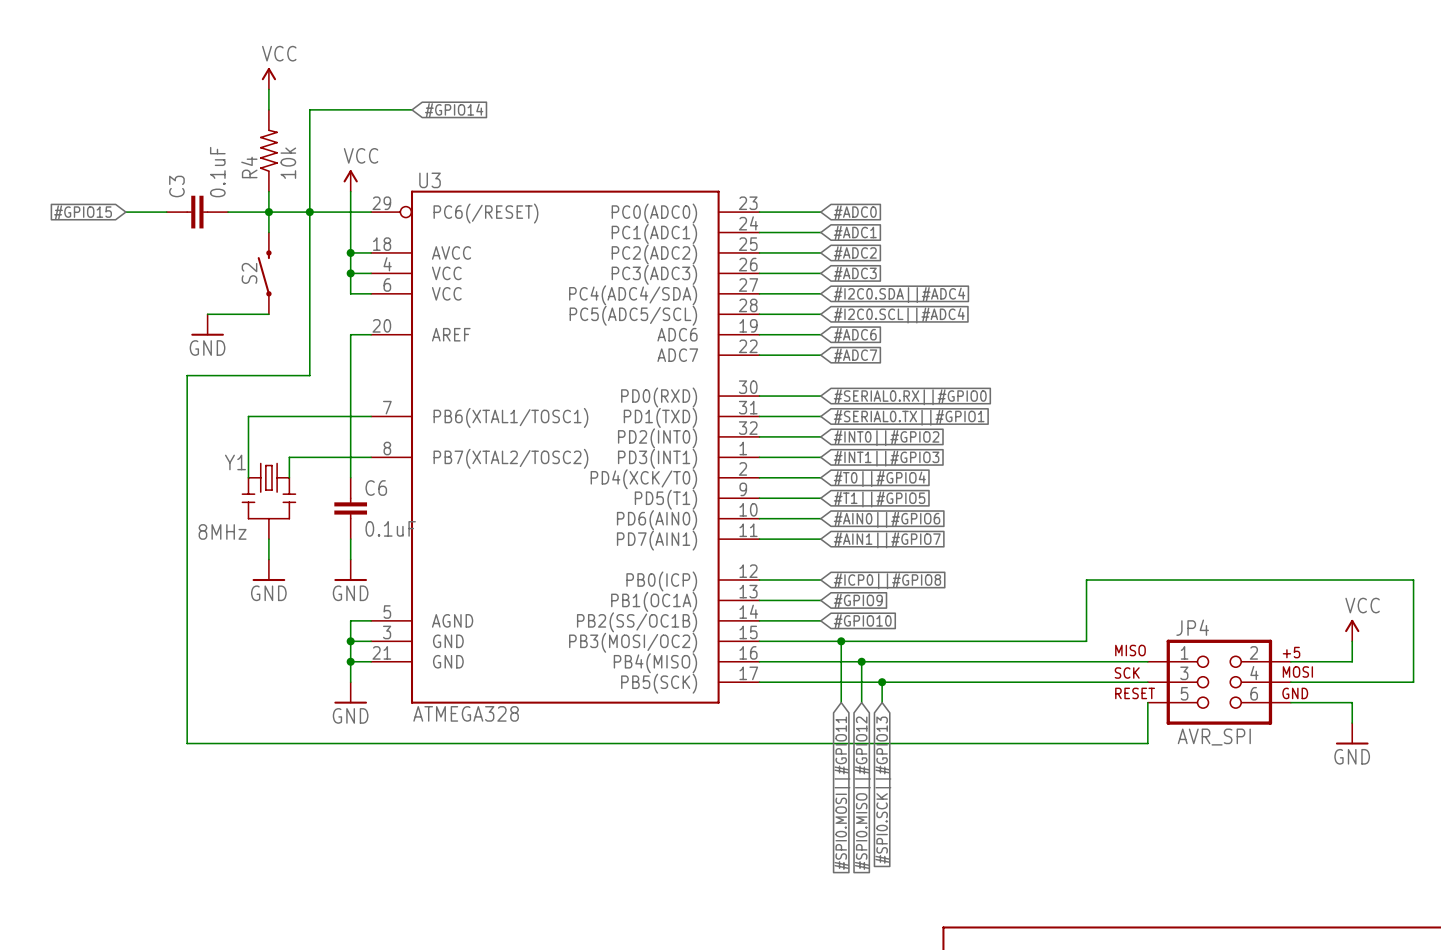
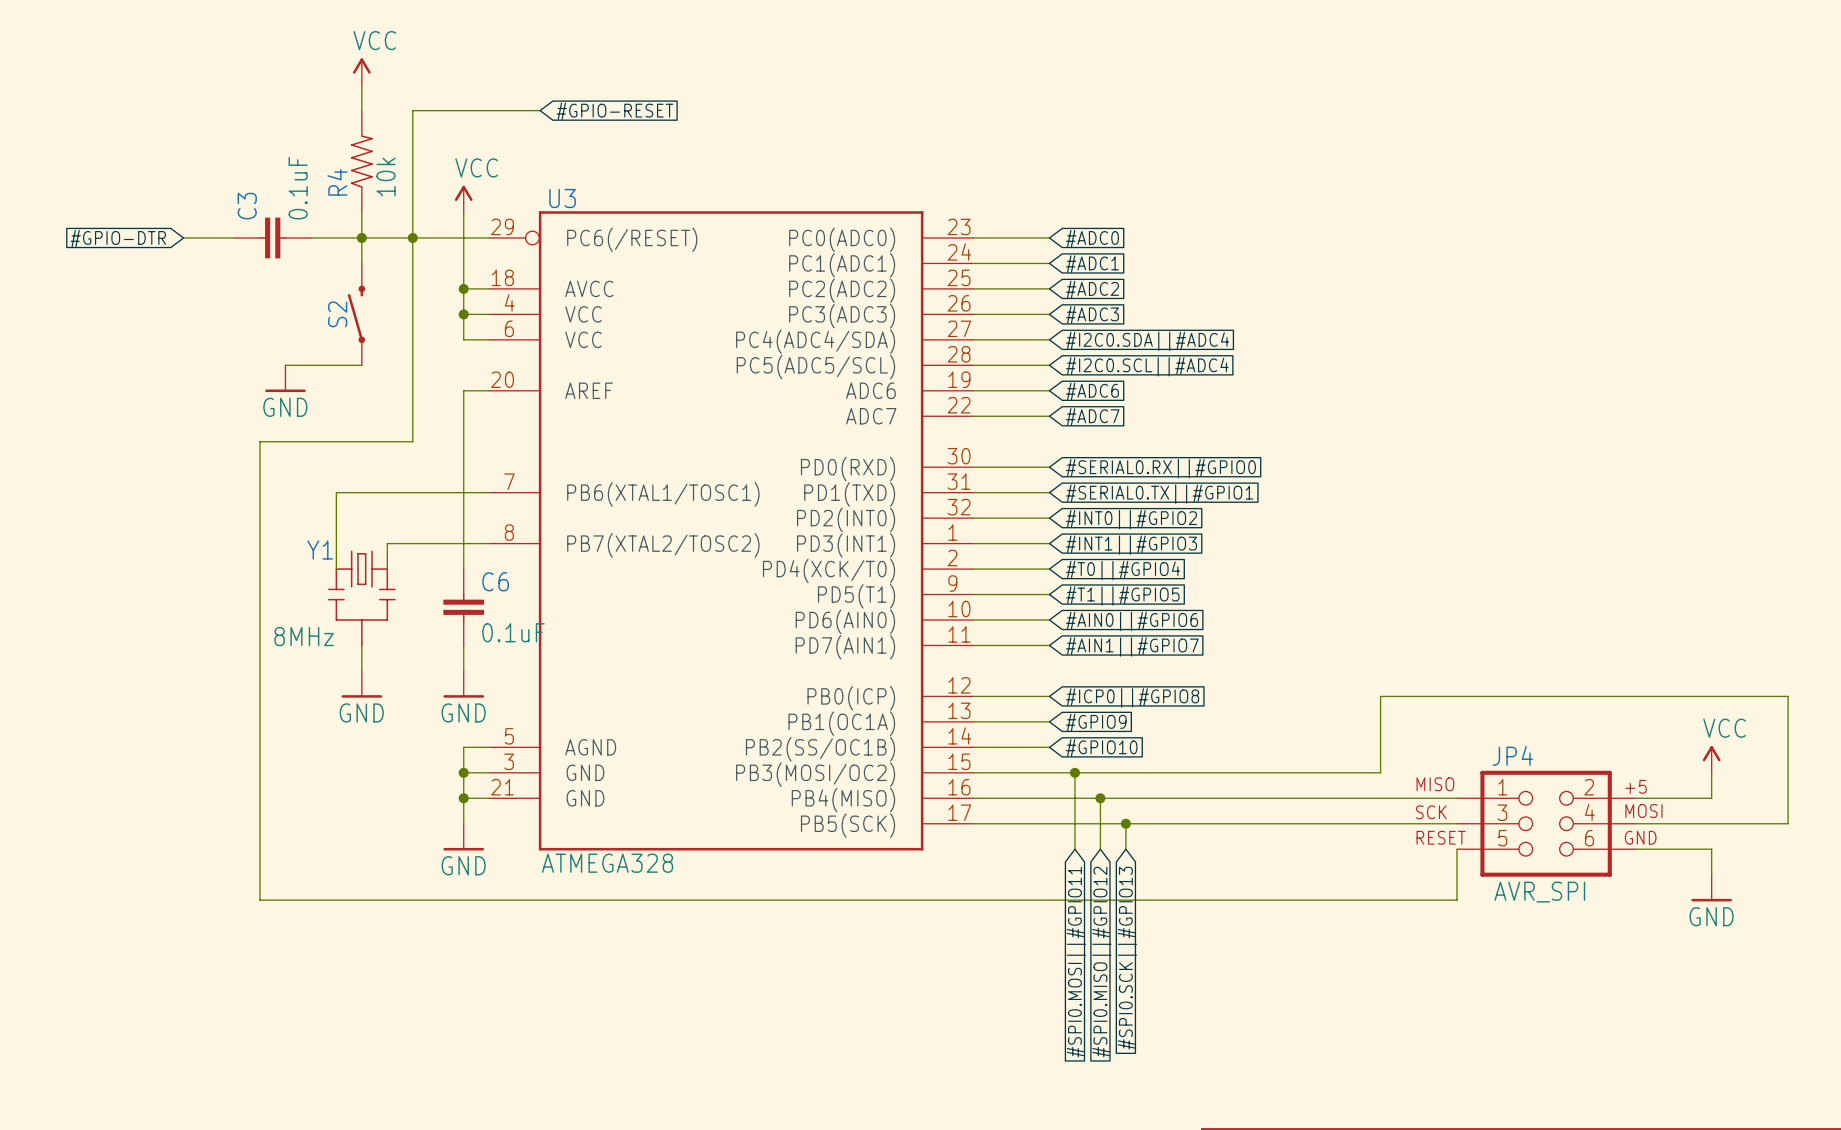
global label: #GPIO14 (454, 110) -> #GPIO-RESET (615, 111)
global label: #GPIO15 (83, 212) -> #GPIO-DTR (118, 238)

